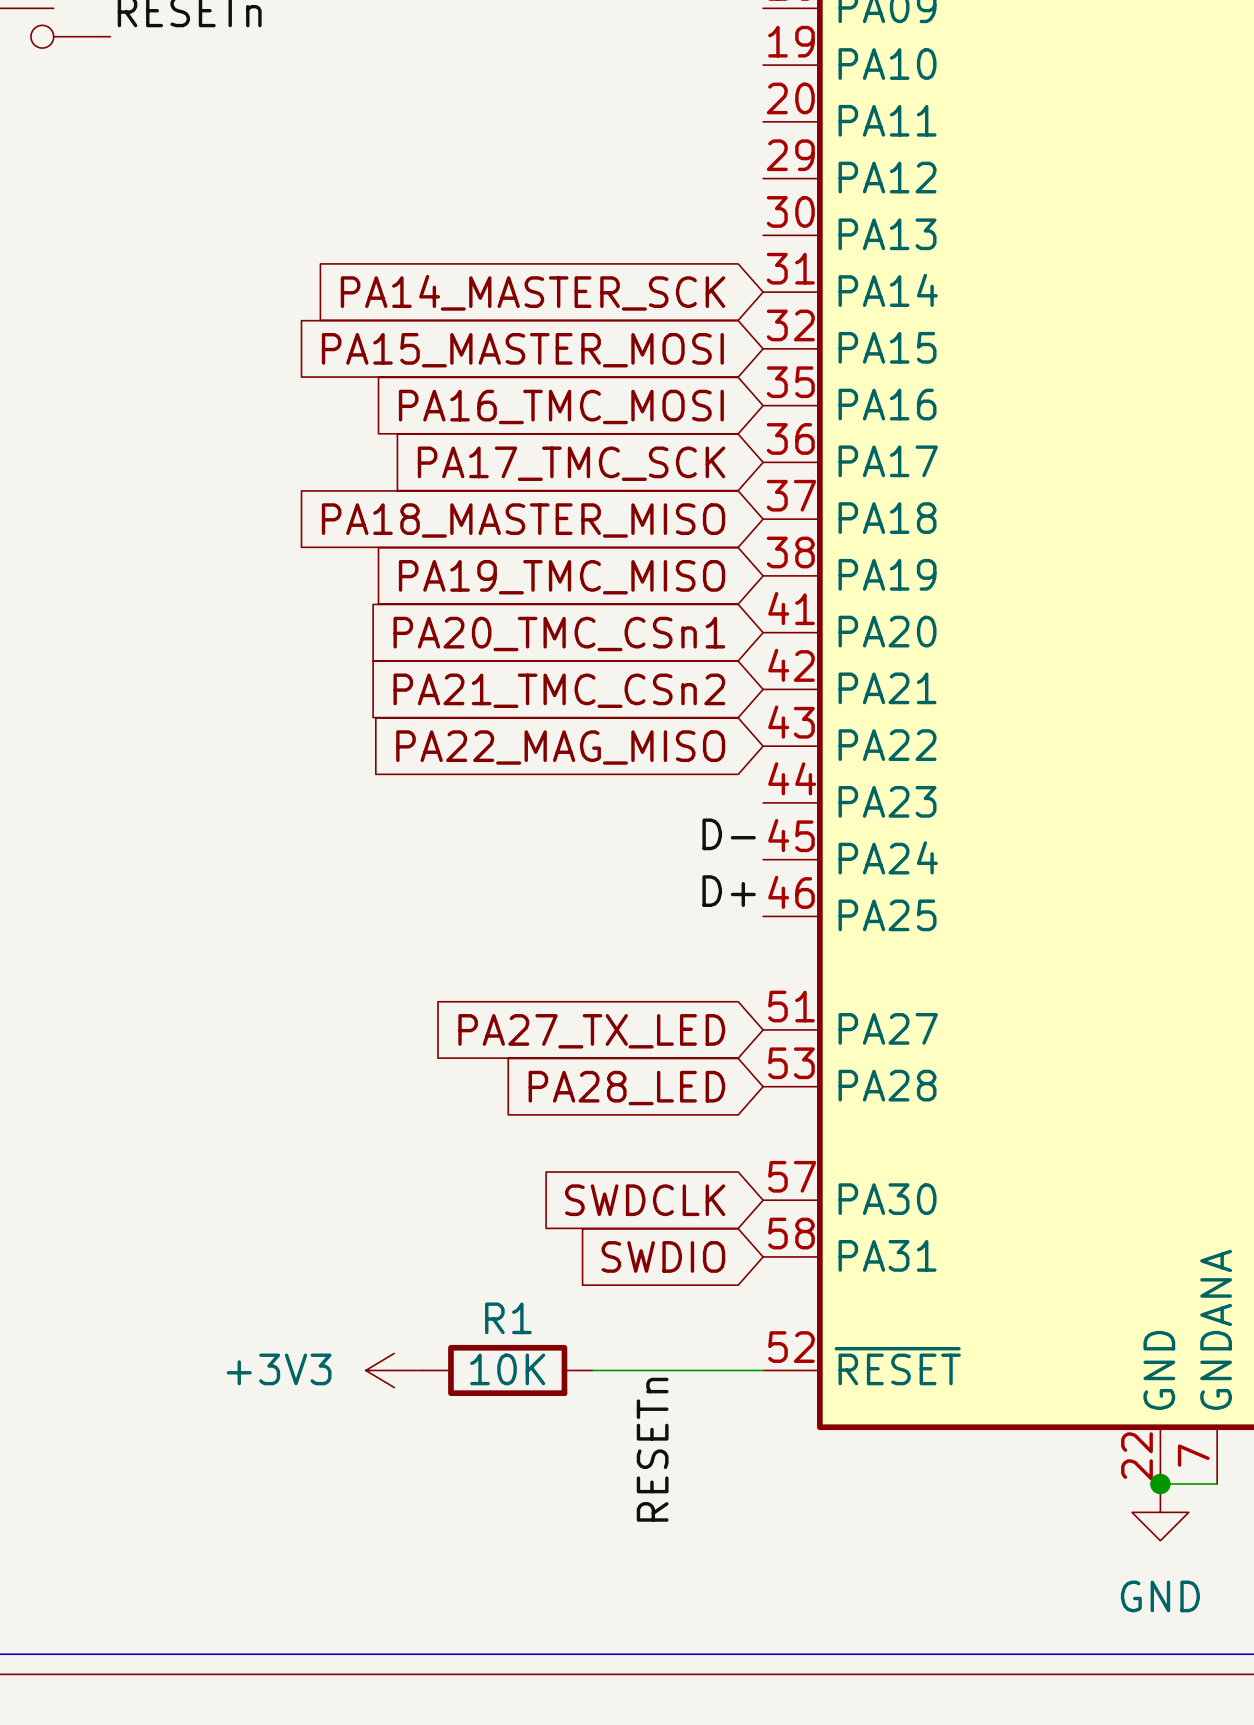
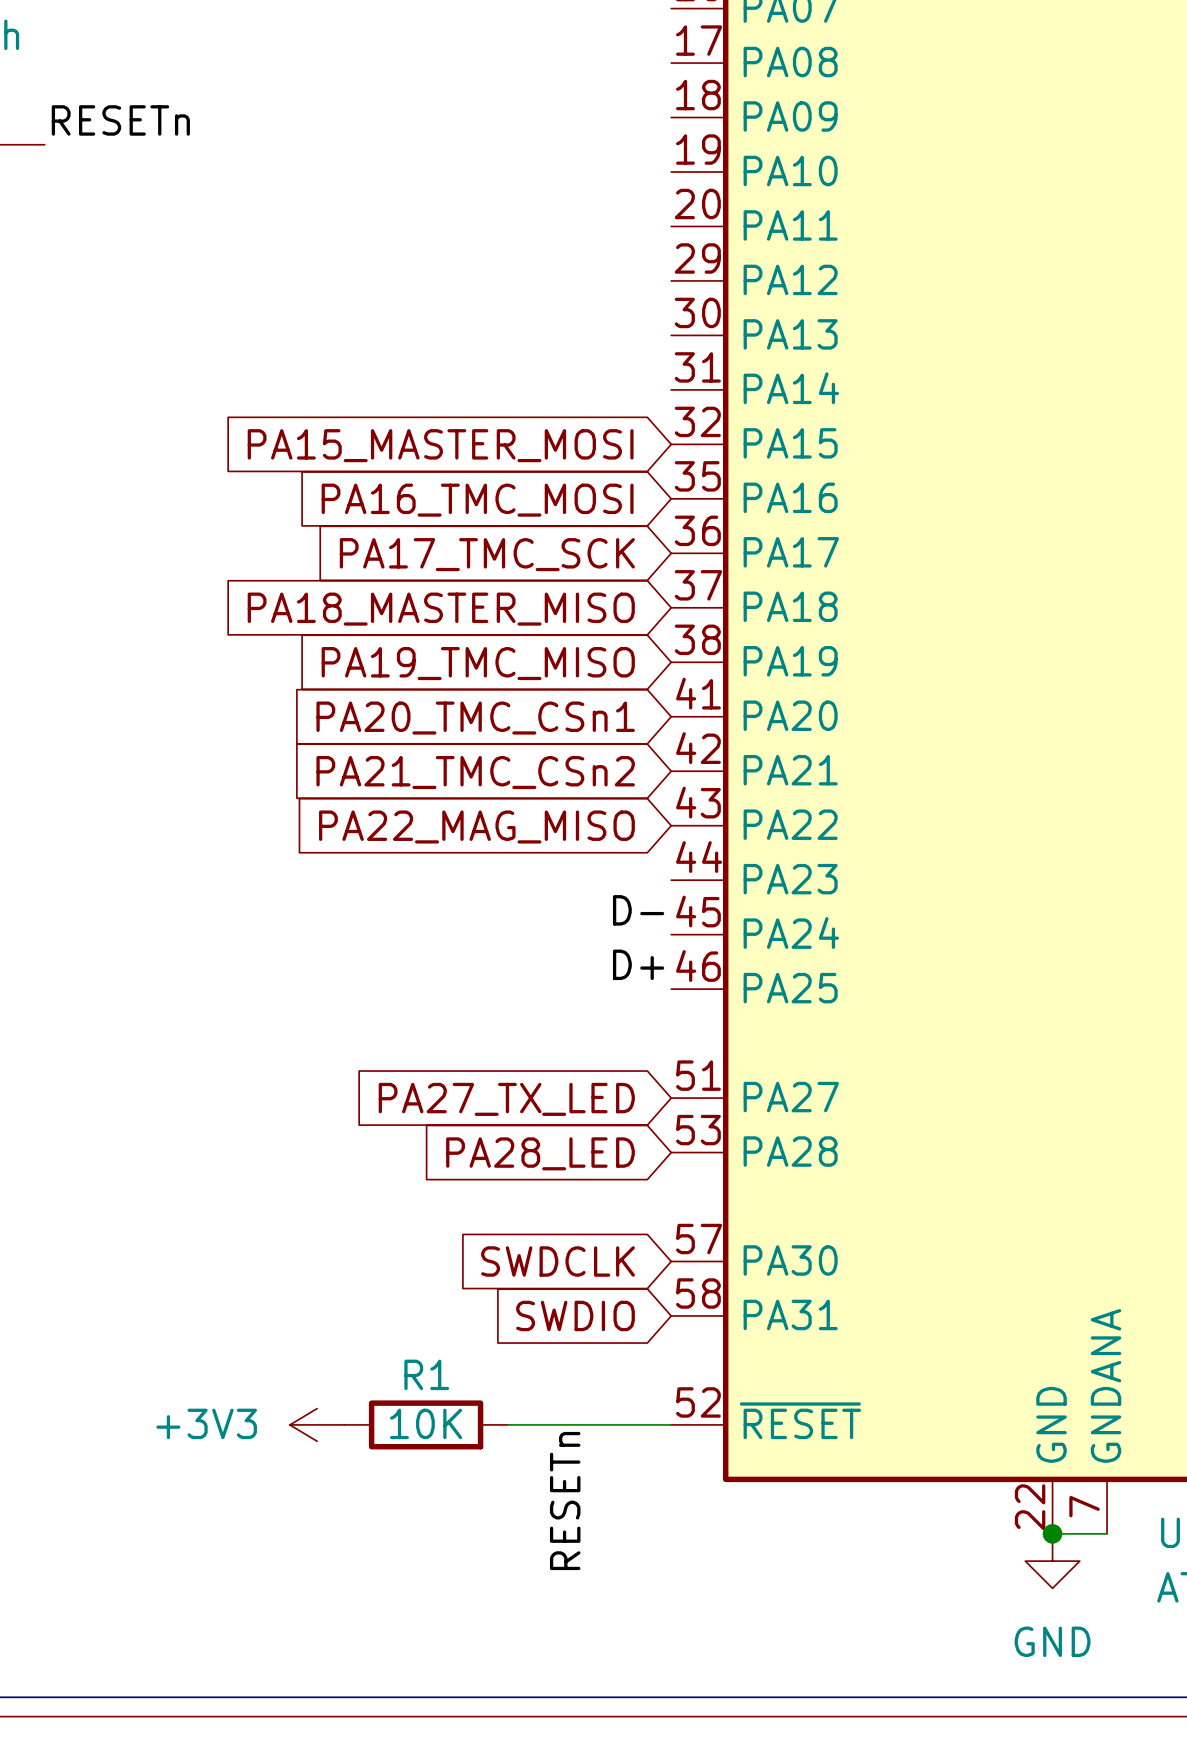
global label: PA14_MASTER_SCK (533, 292) -> none

